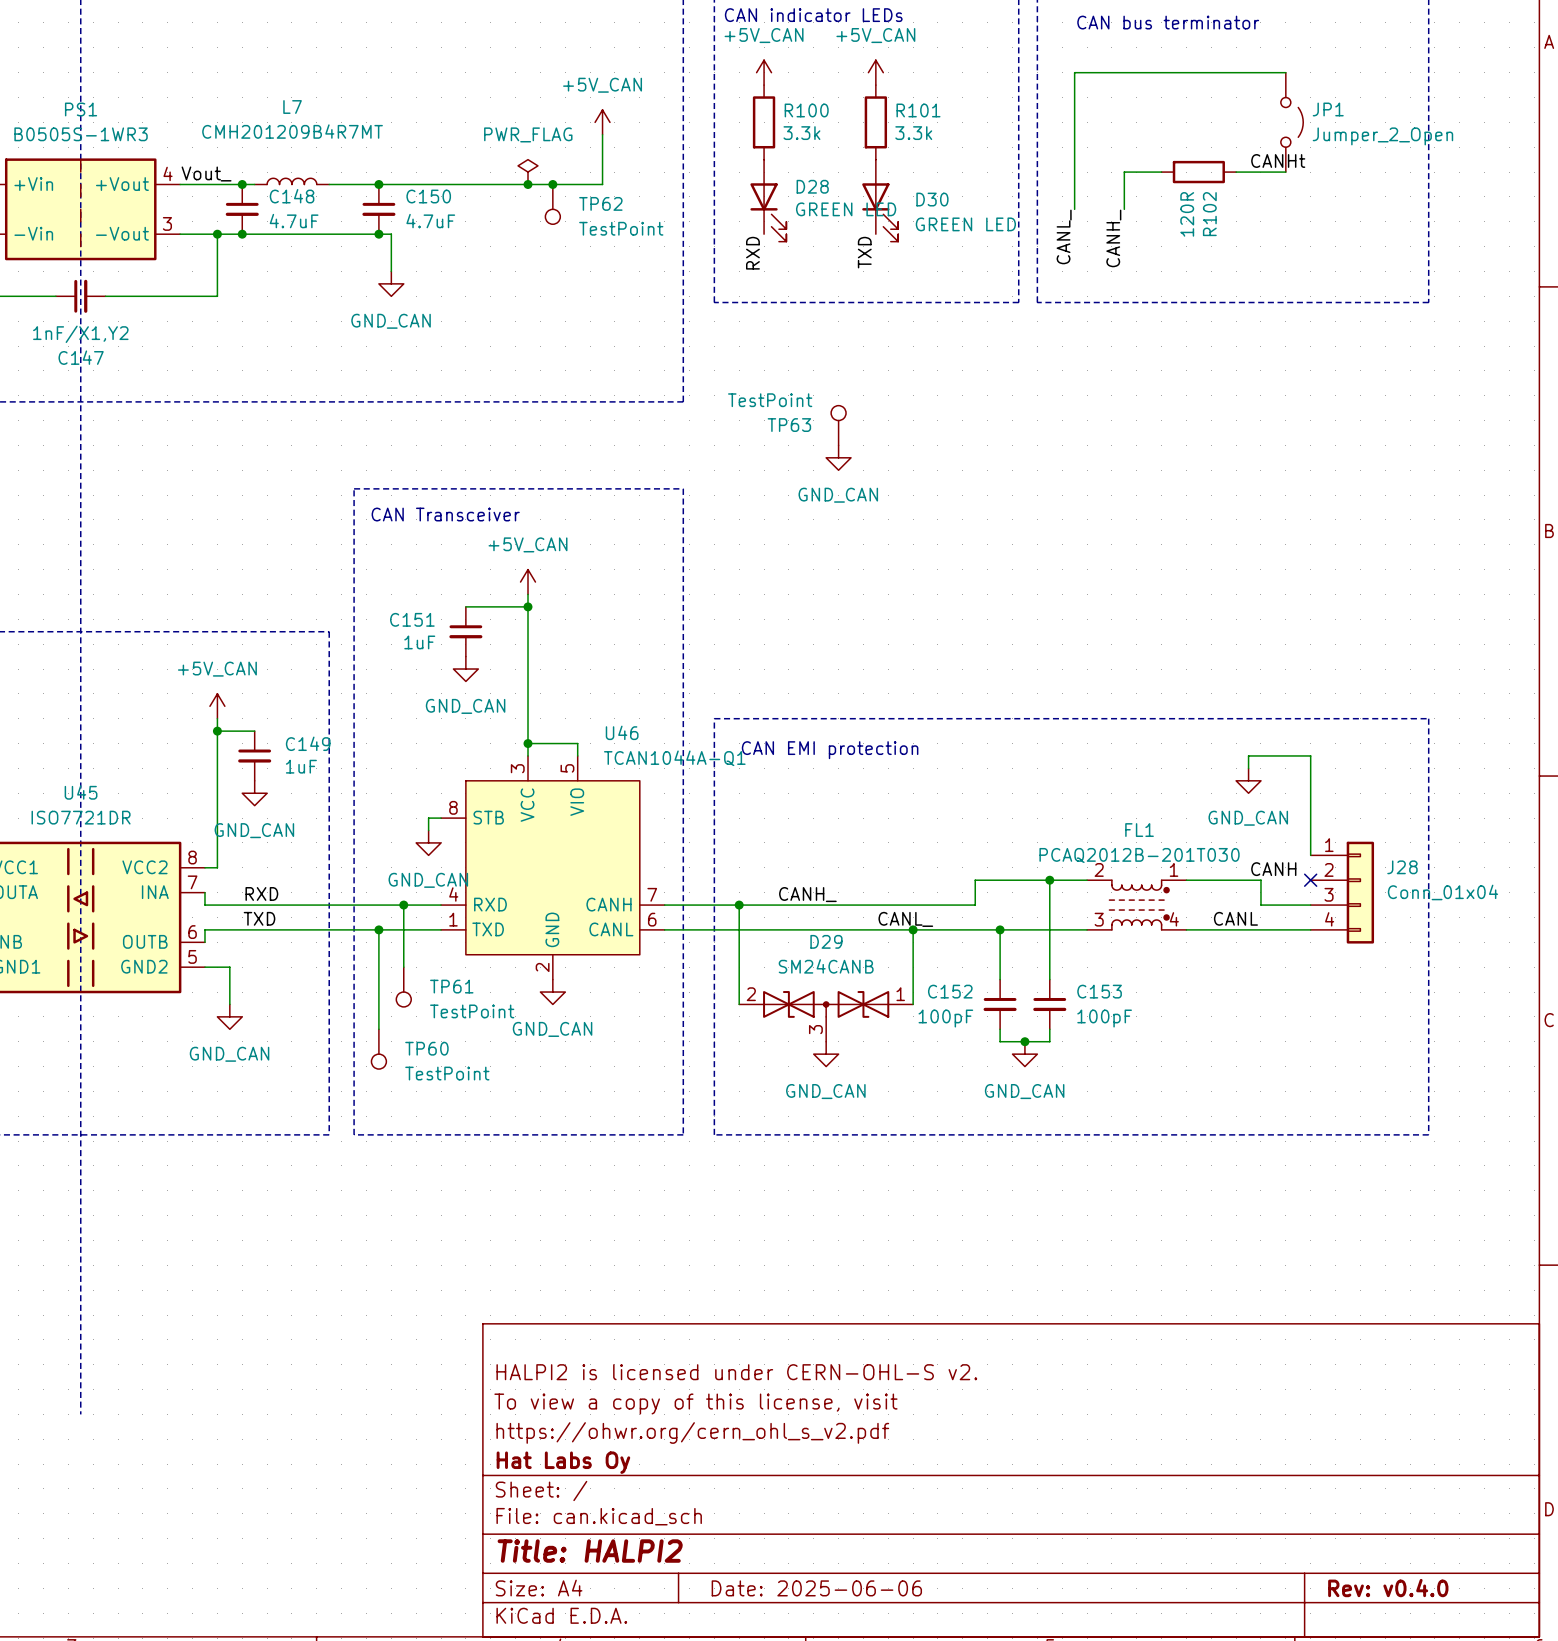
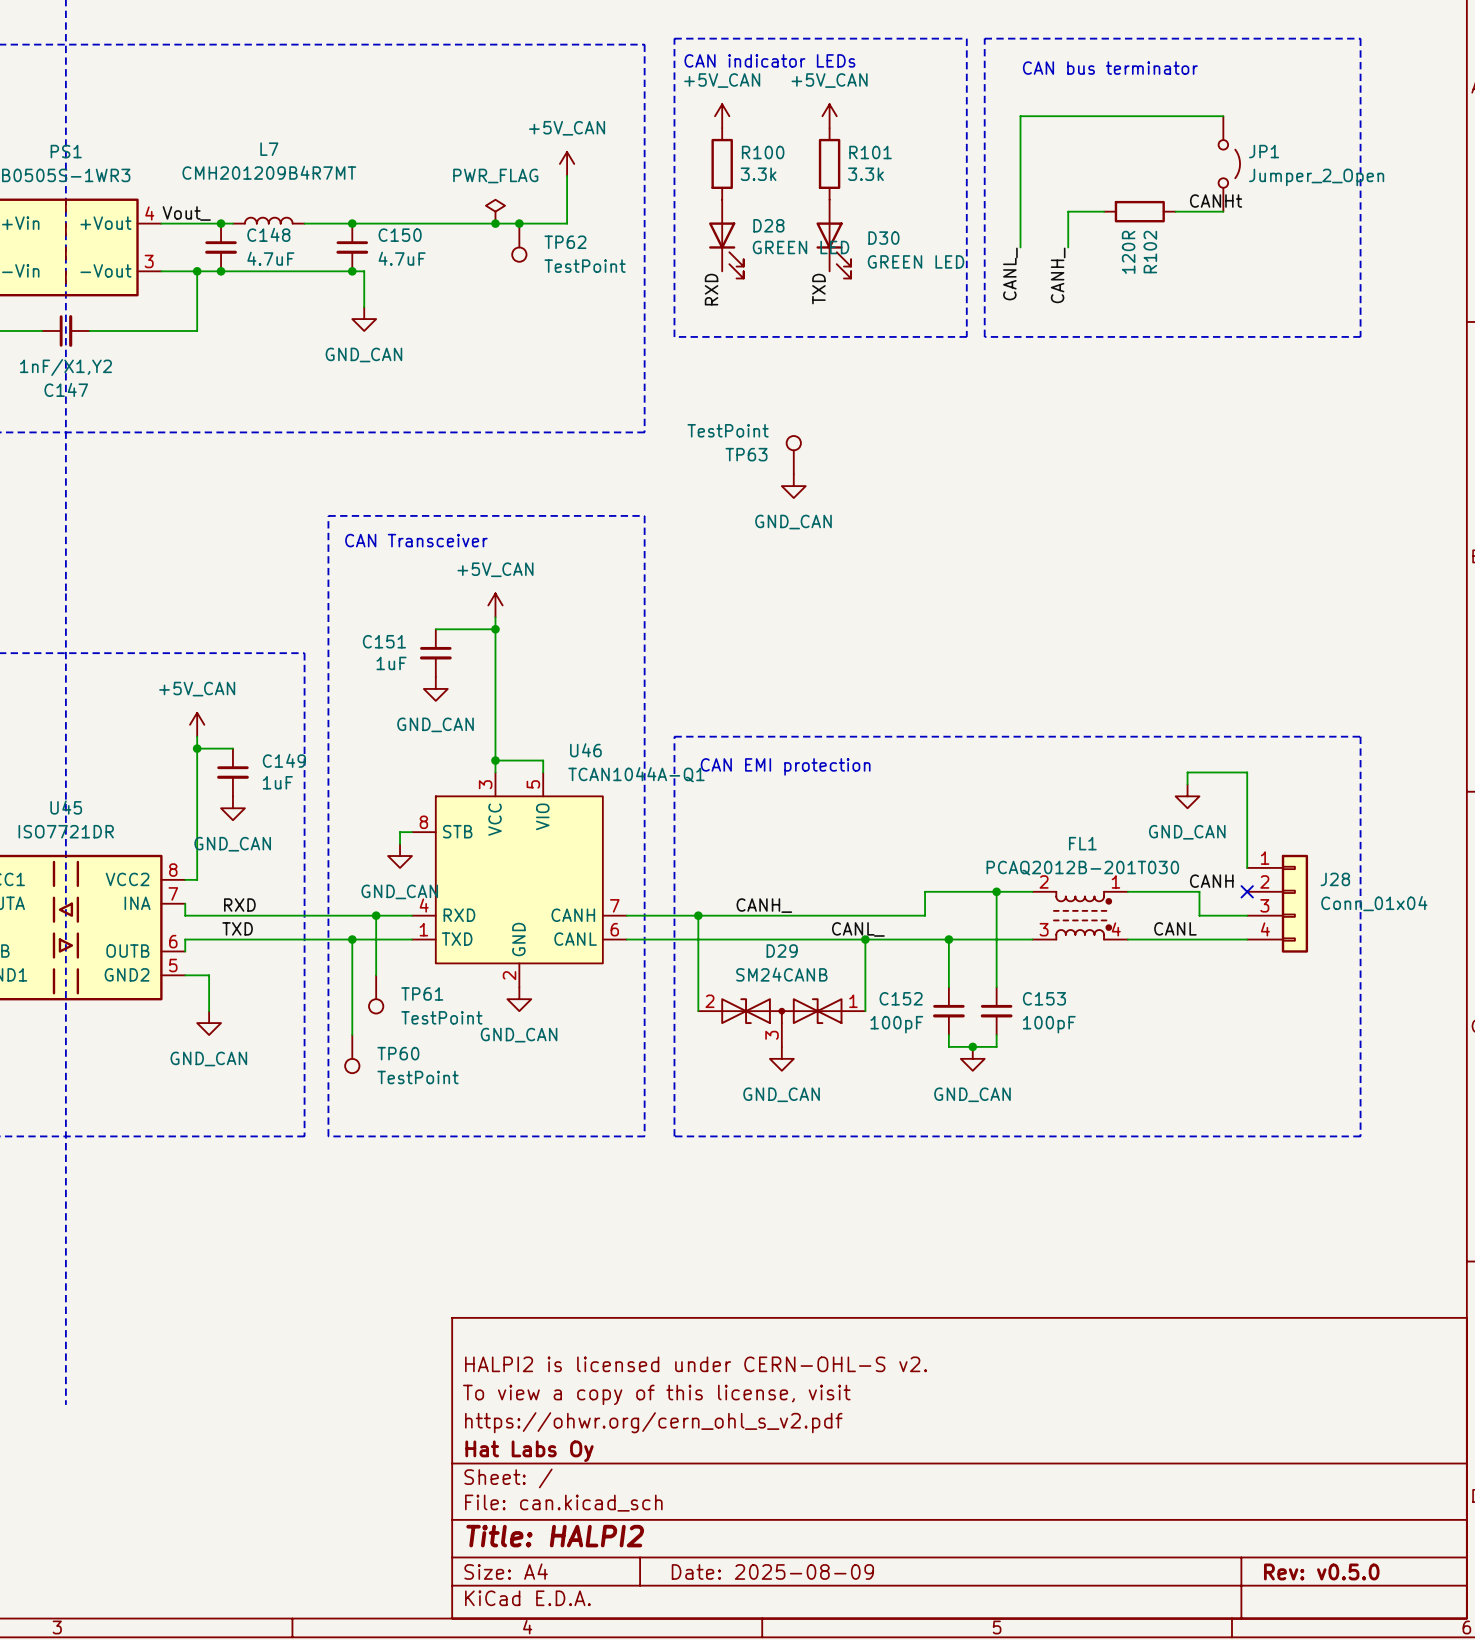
title block: Date: 2025-06-06 (816, 1588) -> Date: 2025-08-09 (772, 1571)
title block: Rev: v0.4.0 (1388, 1588) -> Rev: v0.5.0 (1321, 1571)

